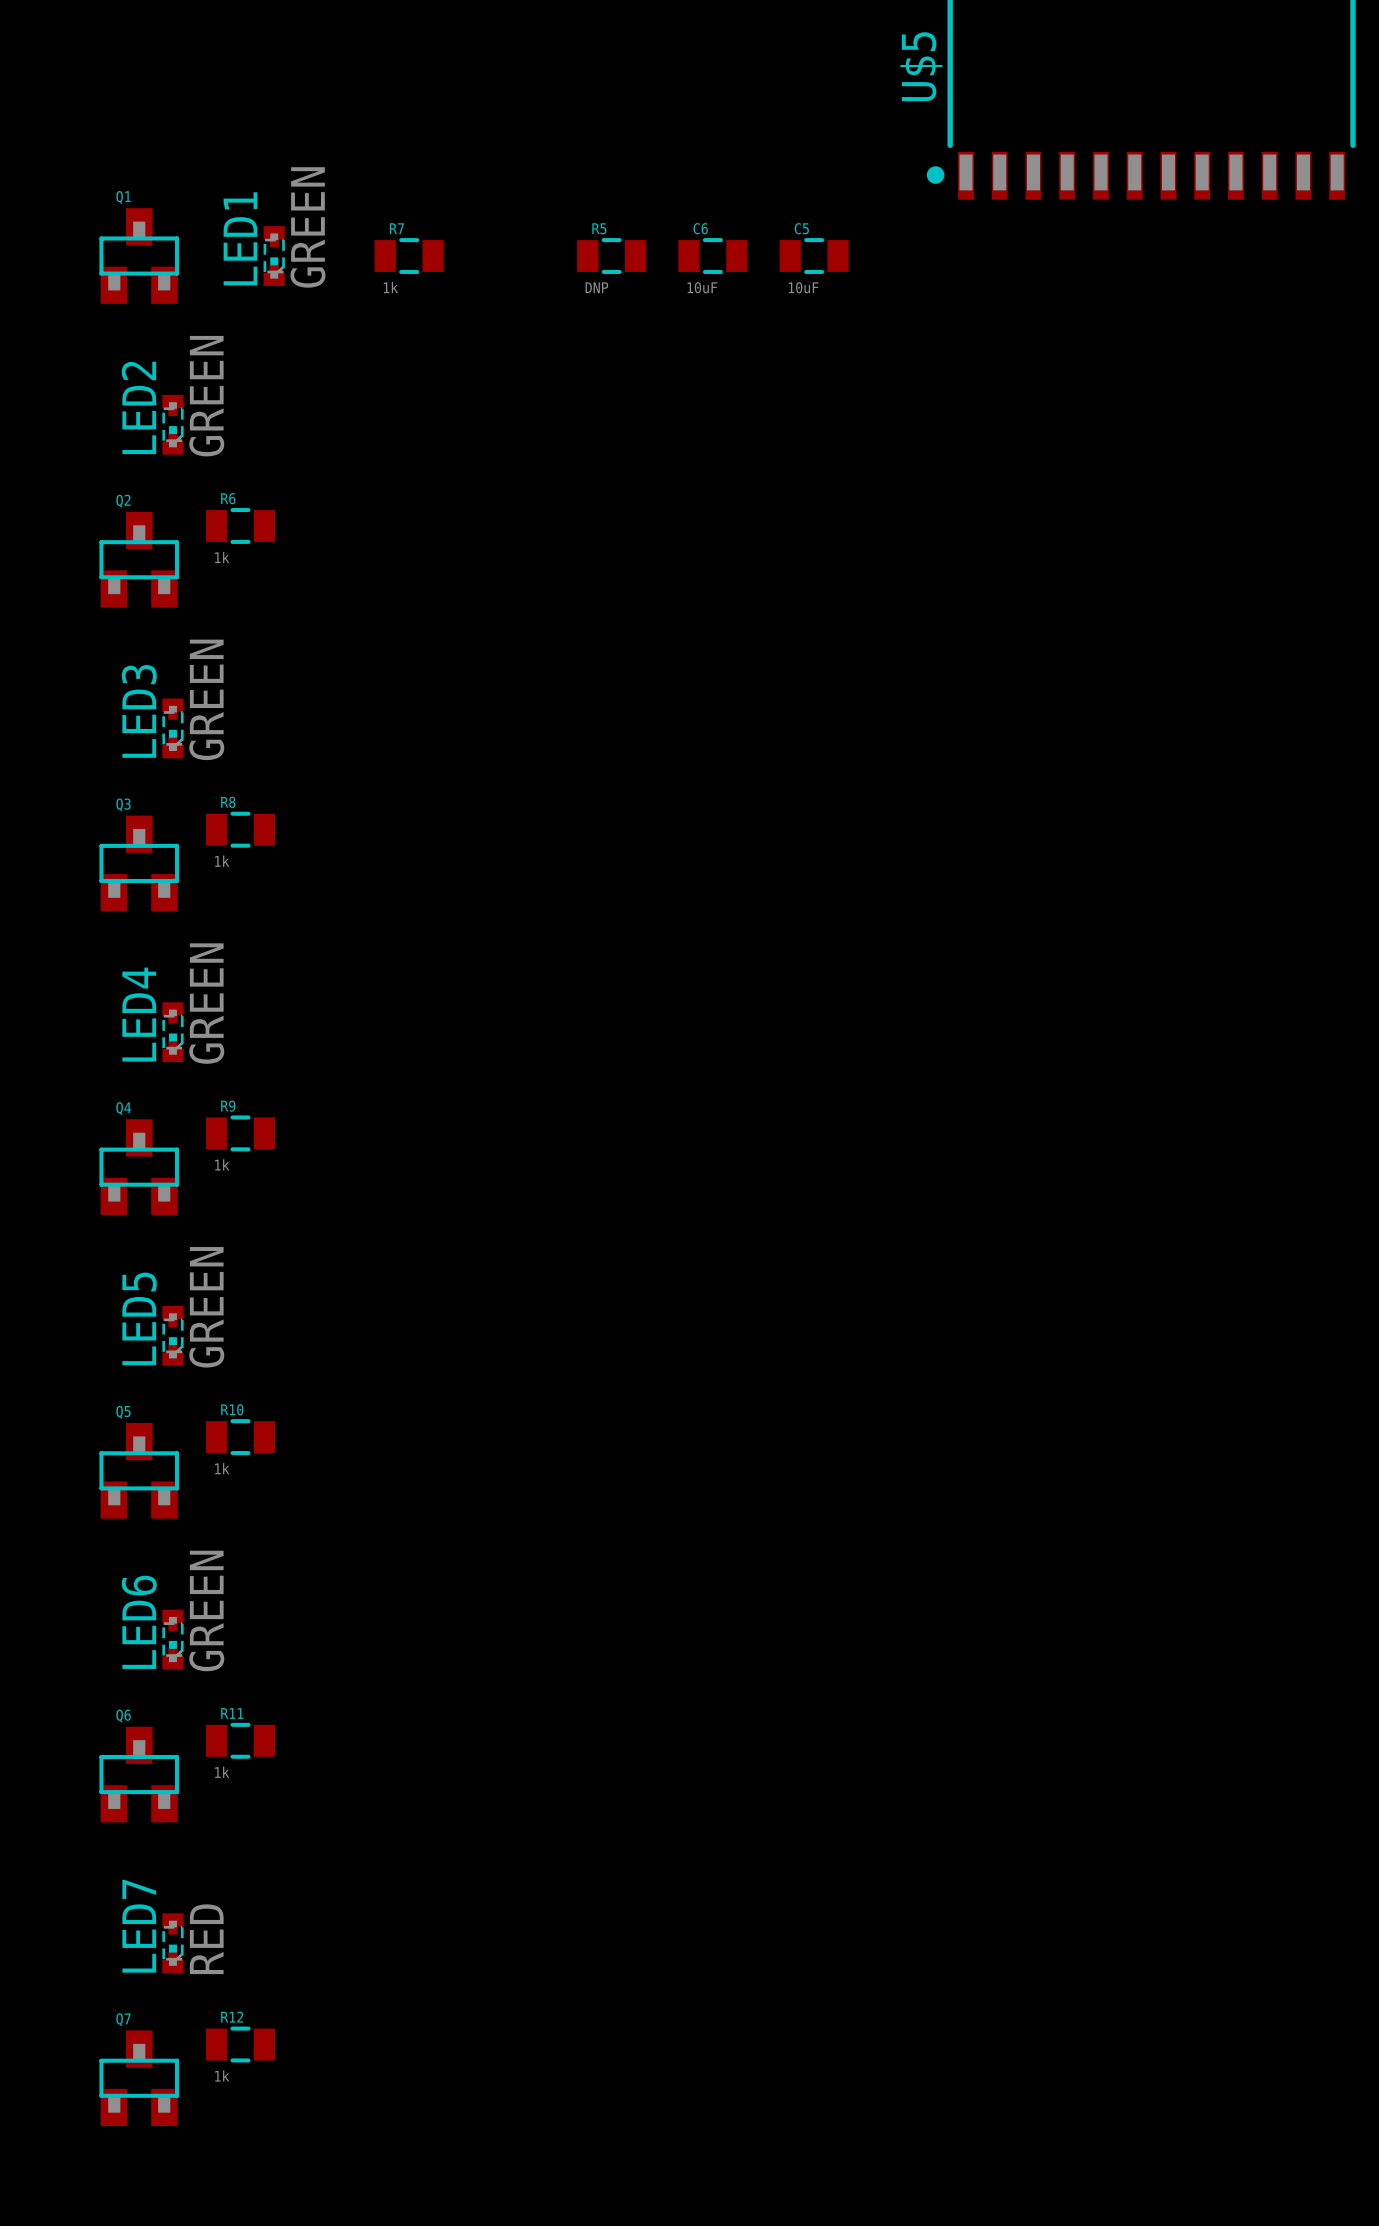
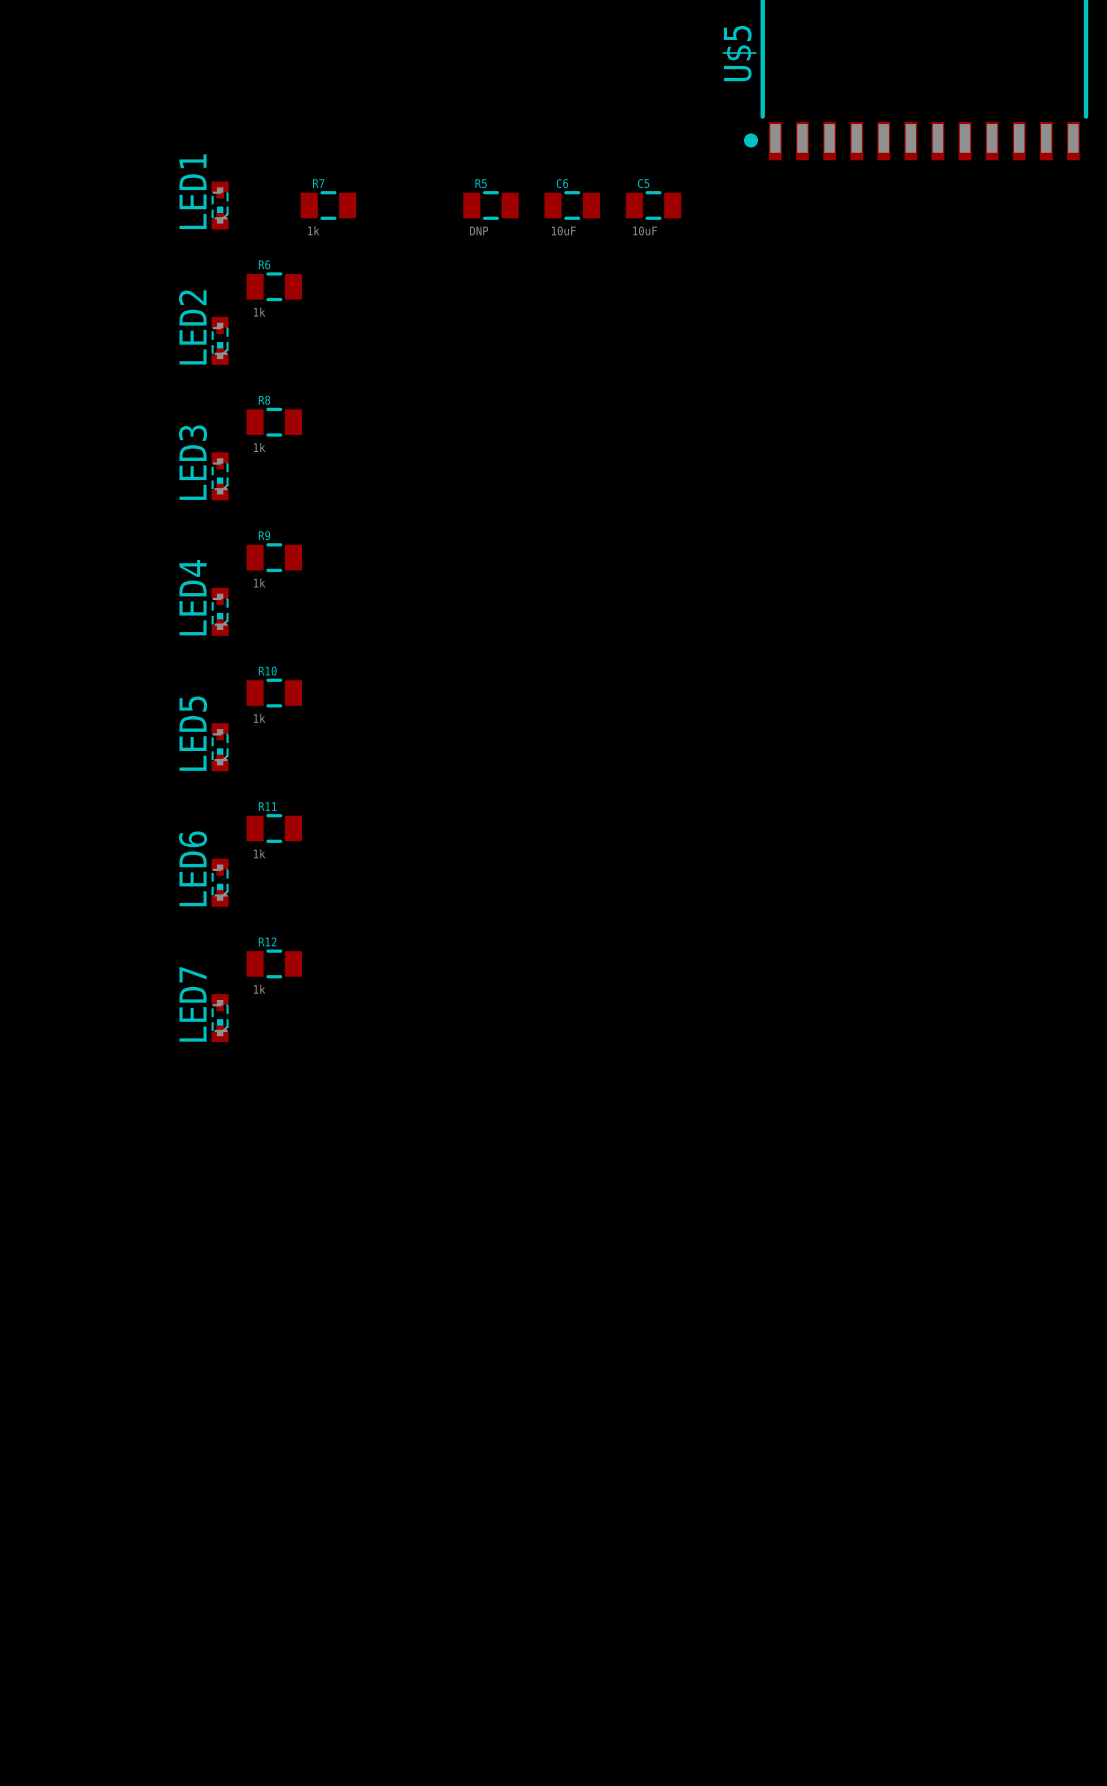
LED1 value: GREEN (307, 227) -> none
Q1: (139, 256) -> none
LED2 value: GREEN (206, 396) -> none
LED2 position: (172, 424) -> (220, 340)
R6 position: (240, 525) -> (274, 286)
Q2: (139, 559) -> none
LED3 value: GREEN (206, 699) -> none
LED3 position: (172, 728) -> (220, 476)
R8 position: (240, 829) -> (274, 422)
Q3: (139, 863) -> none
LED4 value: GREEN (206, 1003) -> none
LED4 position: (172, 1032) -> (220, 611)
R9 position: (240, 1133) -> (274, 557)
Q4: (139, 1167) -> none
LED5 value: GREEN (206, 1307) -> none
LED5 position: (172, 1335) -> (220, 747)
R10 position: (240, 1437) -> (274, 693)
Q5: (139, 1470) -> none
LED6 value: GREEN (206, 1610) -> none
LED6 position: (172, 1639) -> (220, 882)
R11 position: (240, 1740) -> (274, 828)
Q6: (139, 1774) -> none
LED7 value: RED (206, 1939) -> none
LED7 position: (172, 1943) -> (220, 1018)
R12 position: (240, 2044) -> (274, 963)
Q7: (139, 2078) -> none

